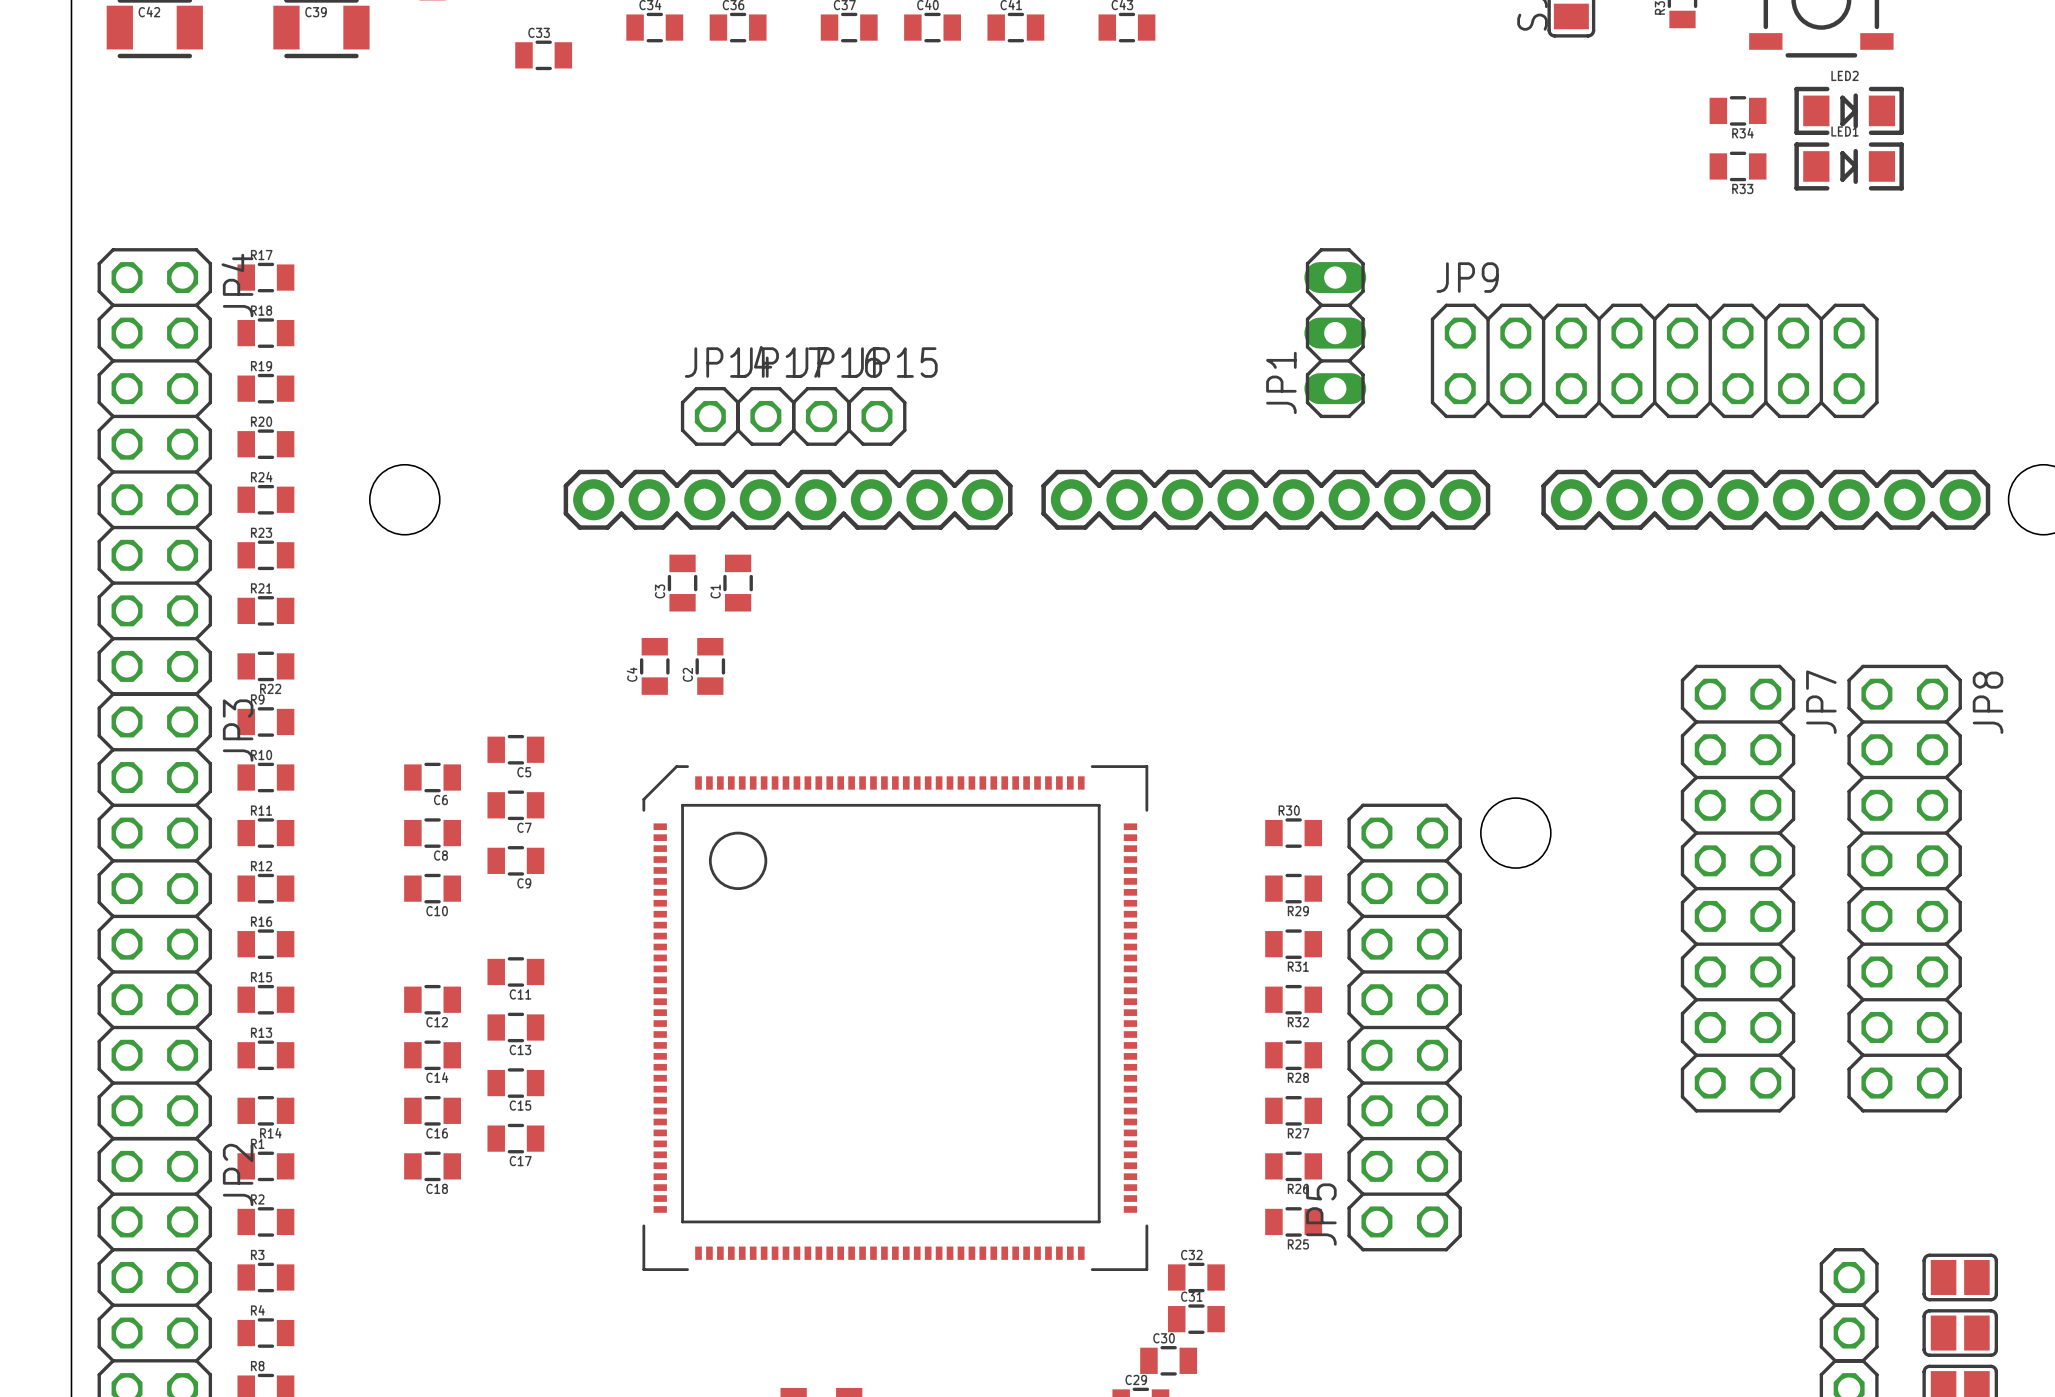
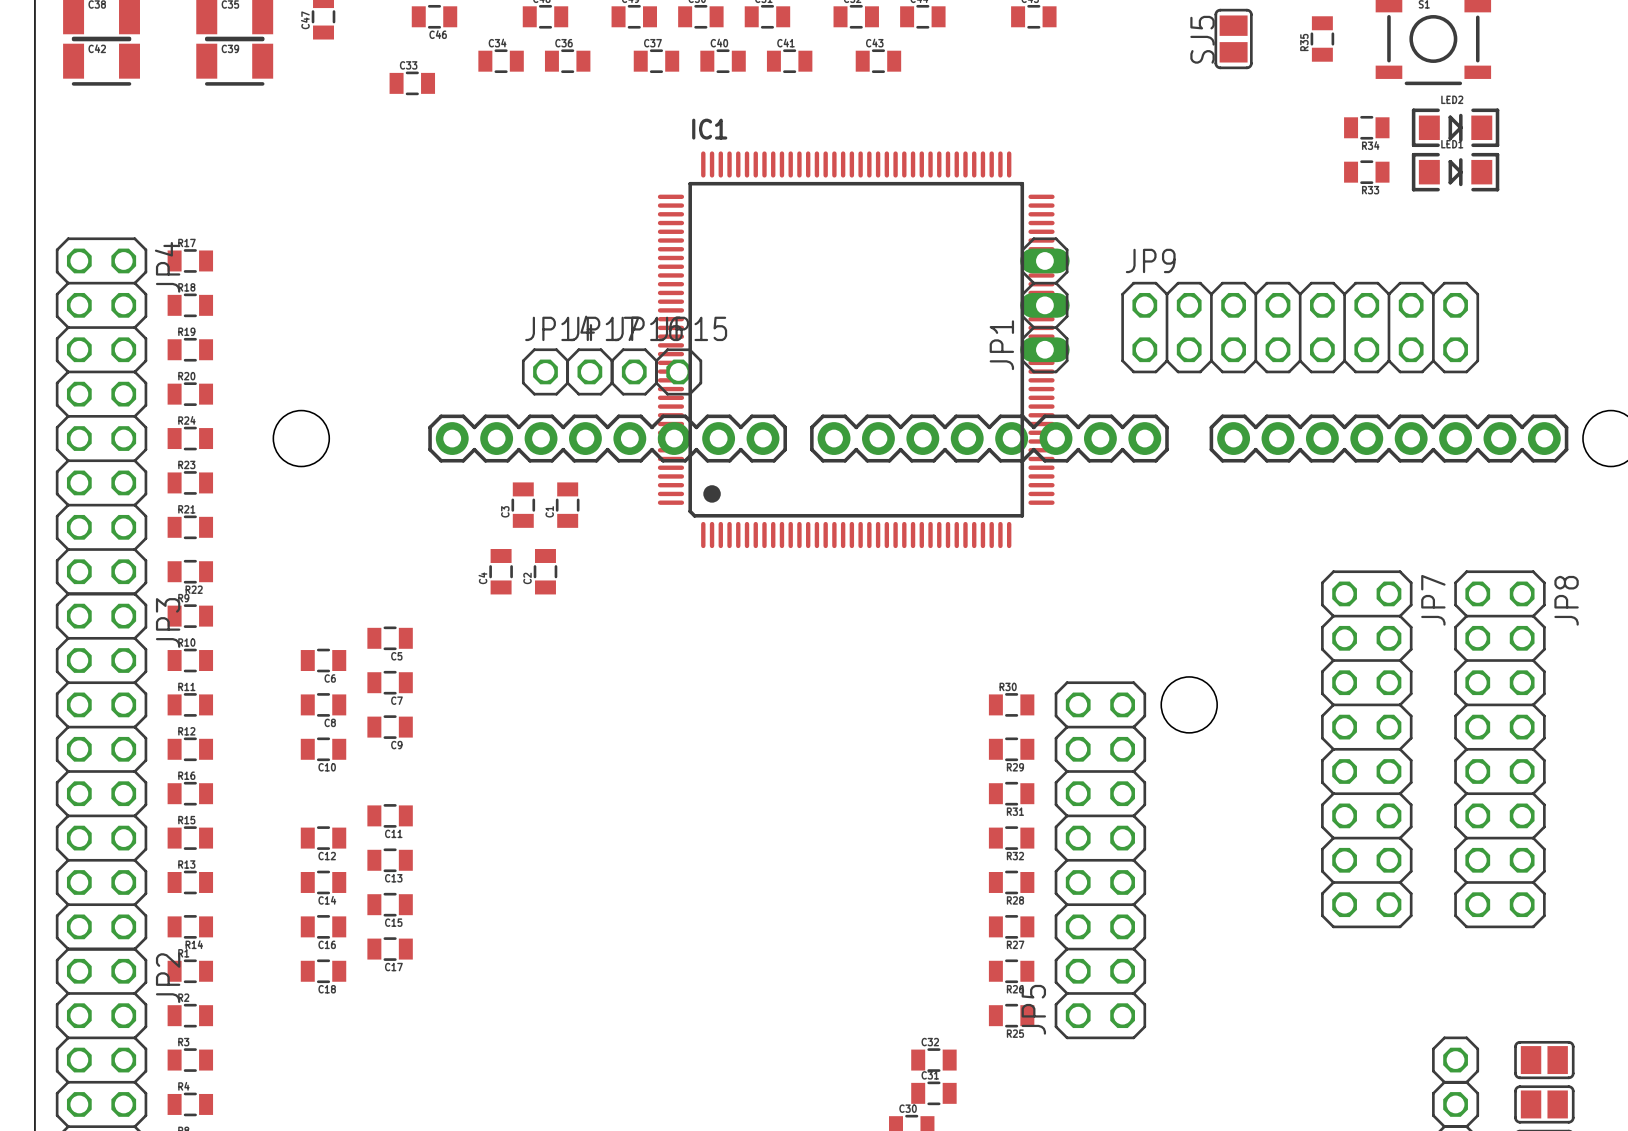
IC1: none -> (856, 349)
part: (895, 1018) -> none

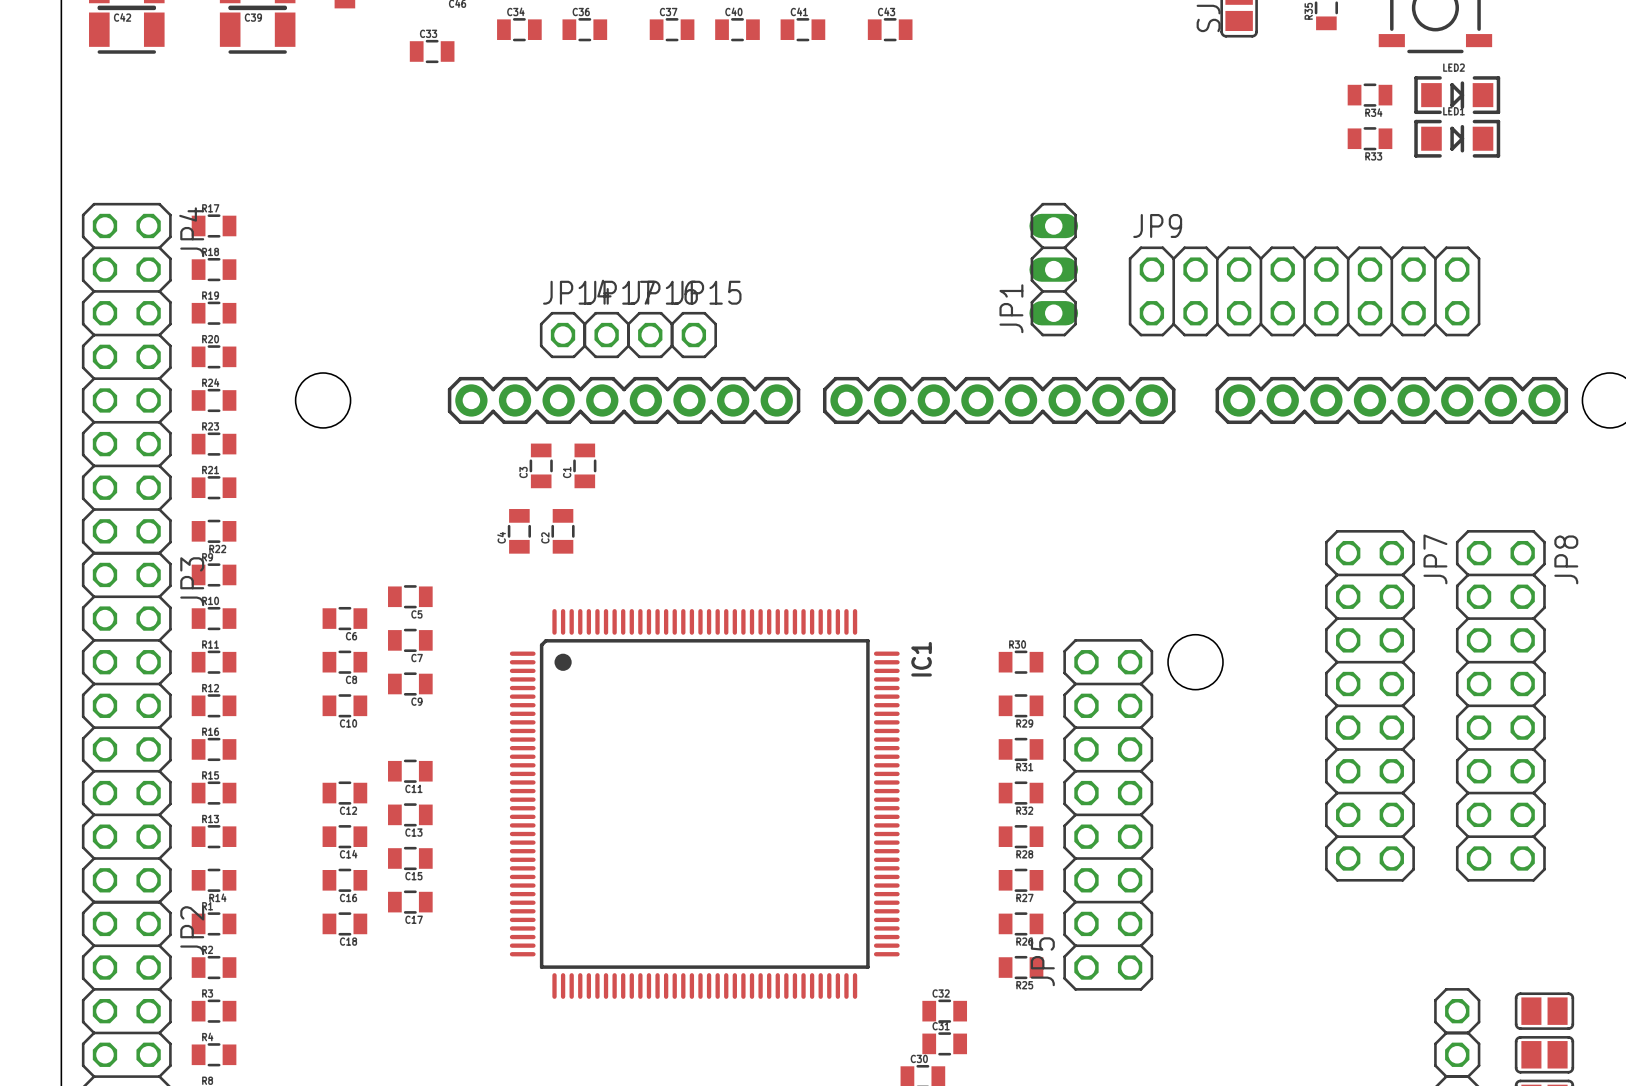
IC1 rotation: 0° (856, 349) -> 90° clockwise (704, 803)
IC1 position: (856, 349) -> (704, 803)

